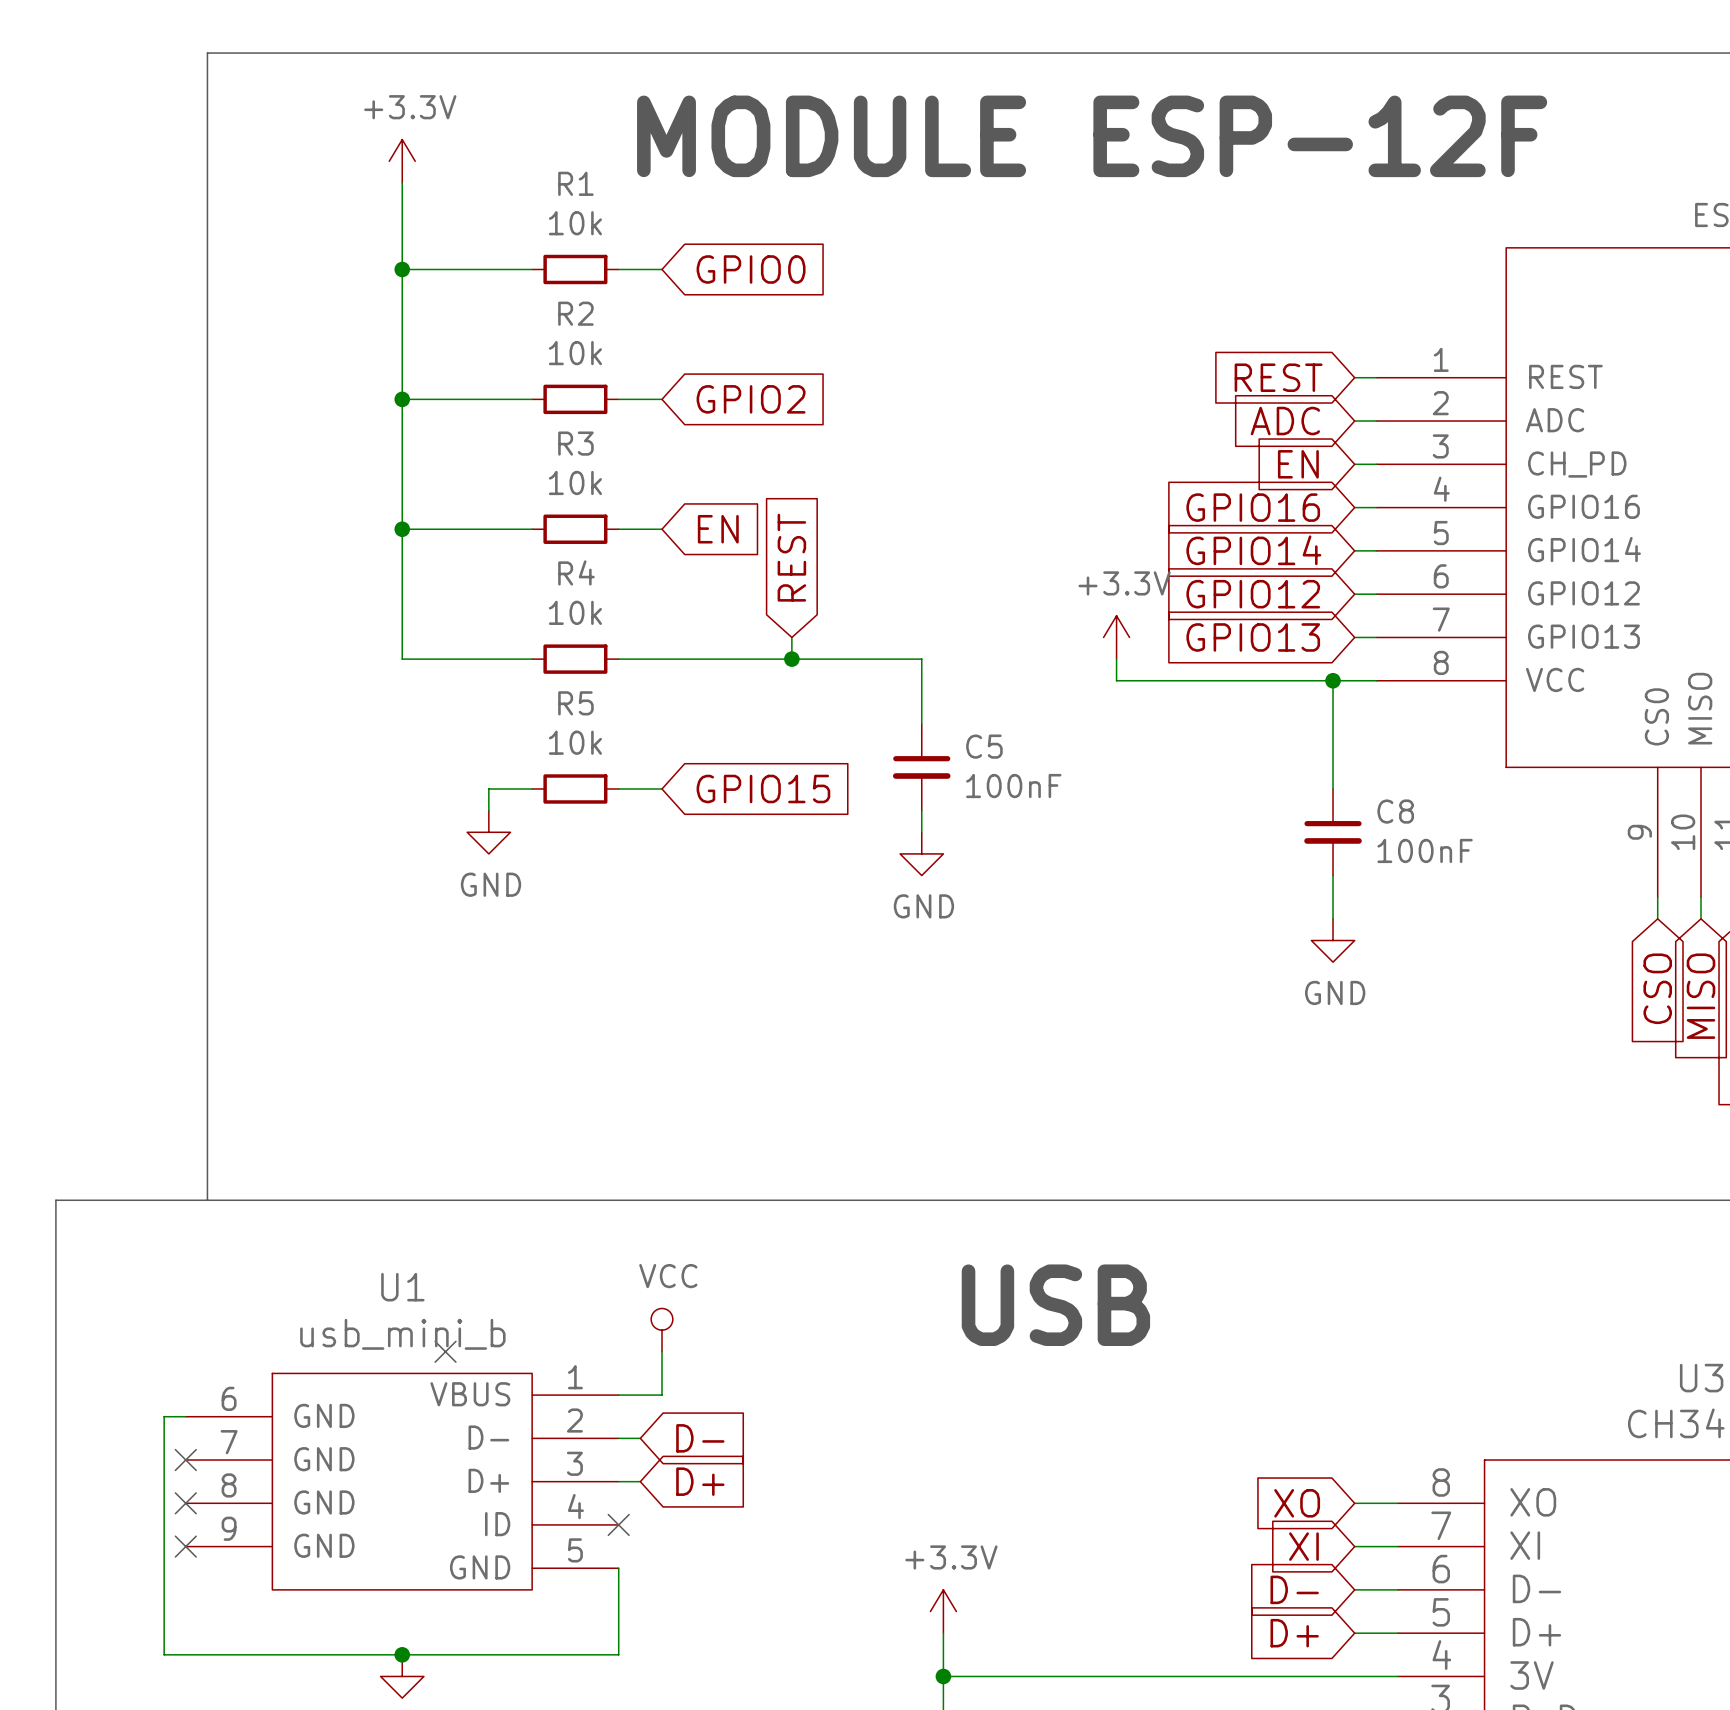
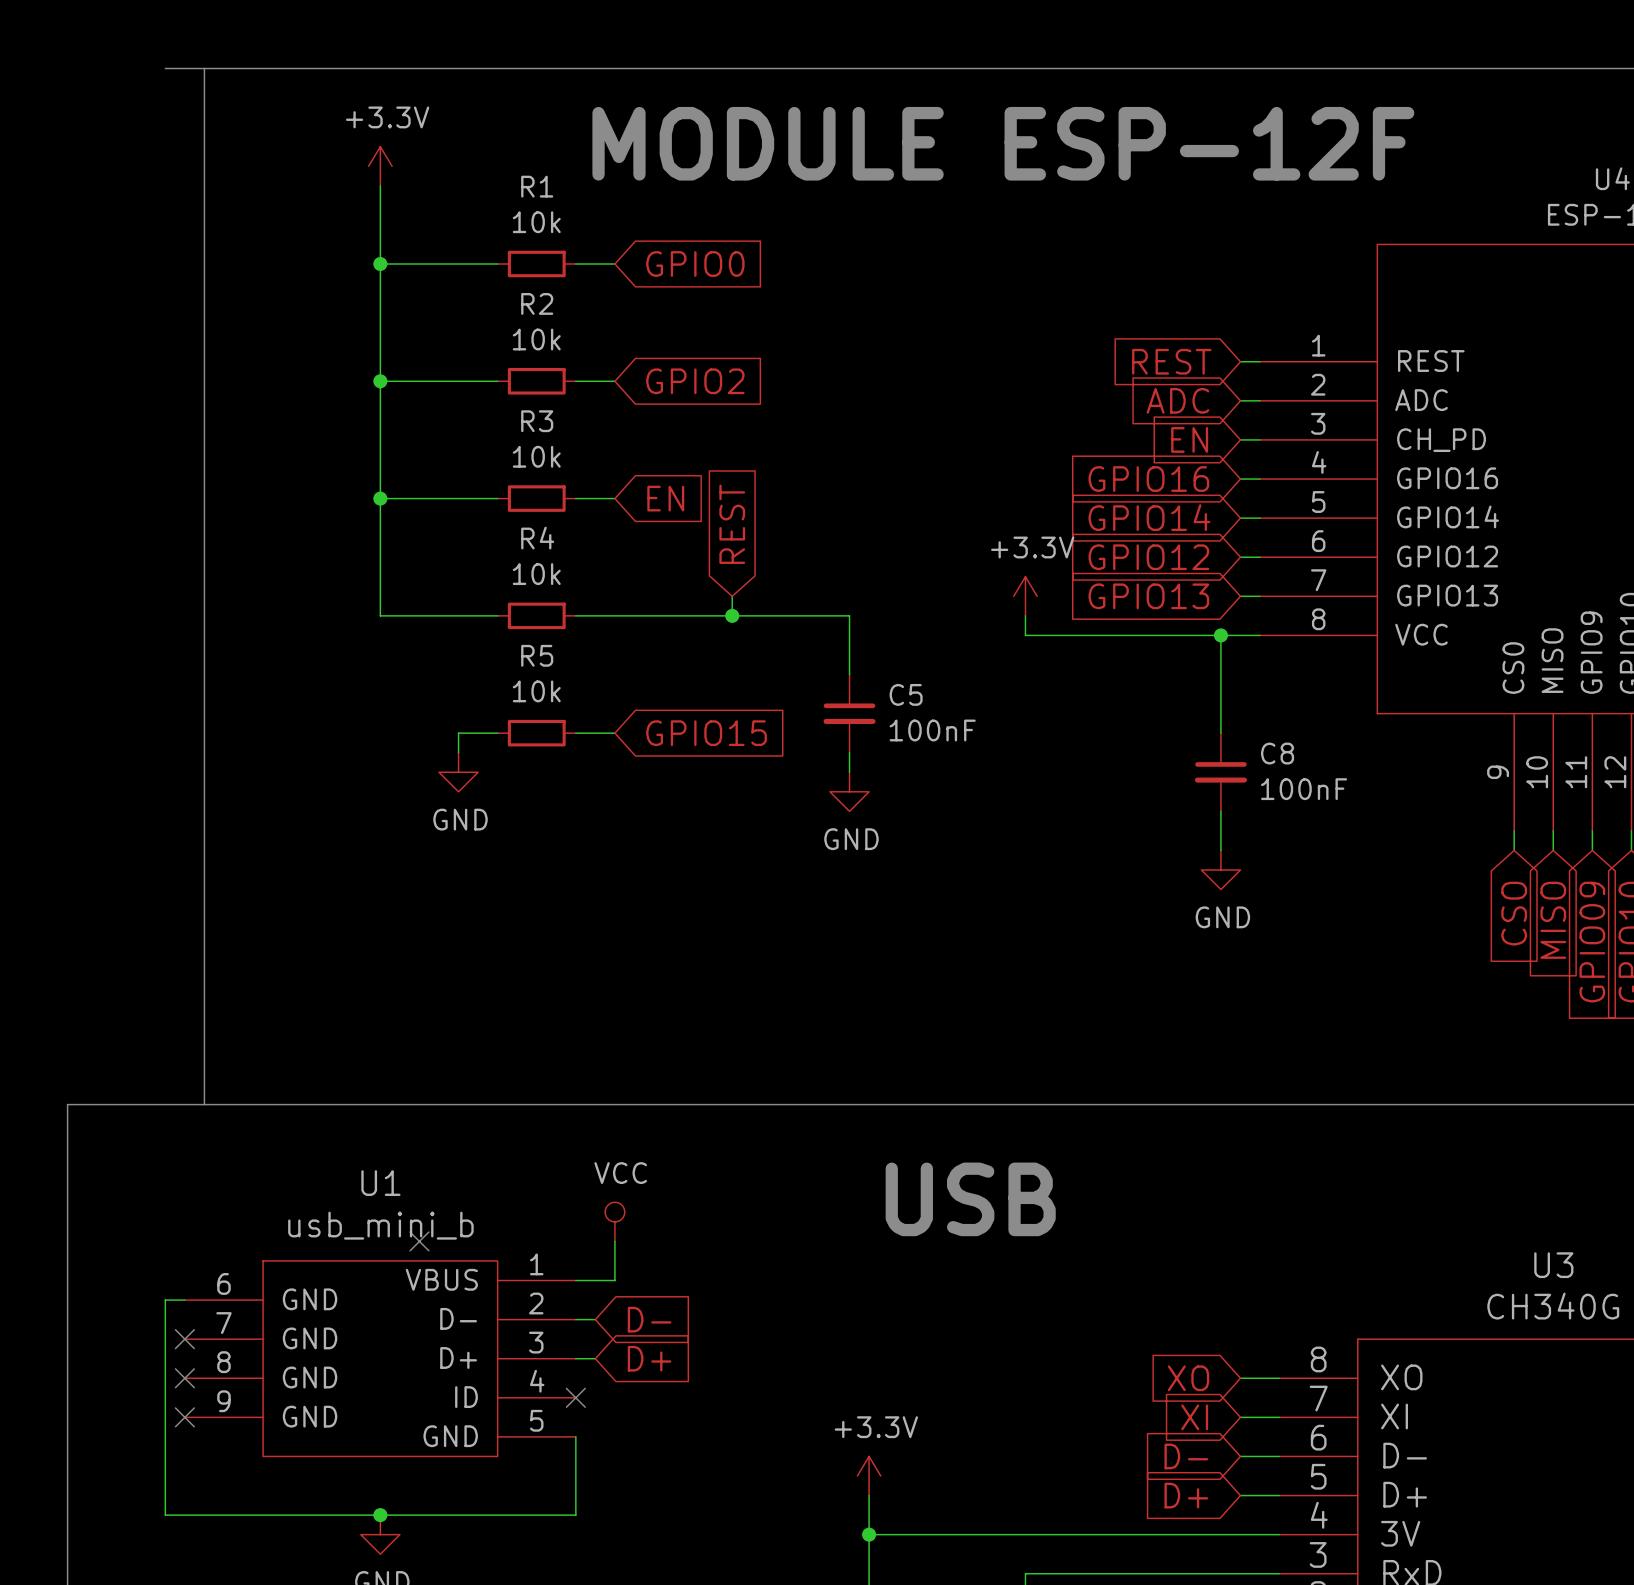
bus: none -> (165, 68) (204, 68)

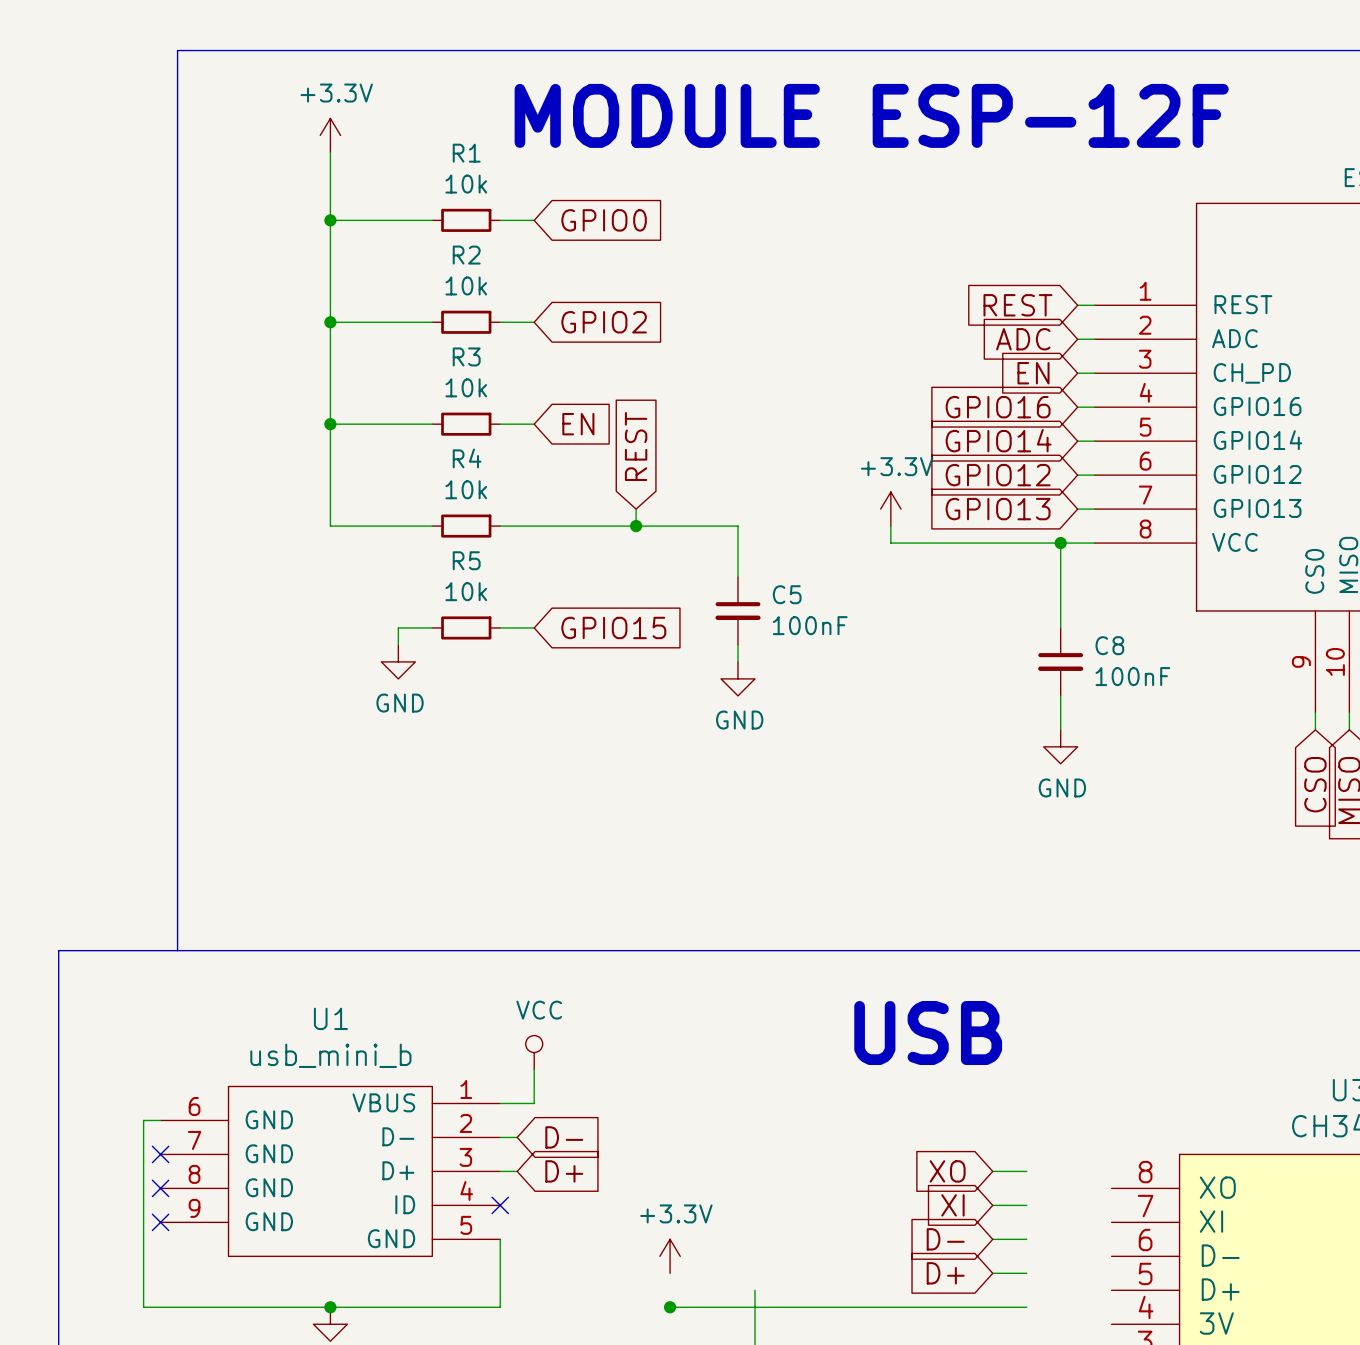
bus: (165, 68) (204, 68) -> none
text position: USB (970, 1199) -> USB (928, 1032)
no-connect mark: (419, 1241) -> none
global label position: XO (1188, 1378) -> XO (947, 1171)
wire: (1240, 1378) (1279, 1378) -> (992, 1171) (1026, 1171)
global label position: XI (1194, 1417) -> XI (952, 1205)
wire: (1240, 1417) (1279, 1417) -> (992, 1205) (1026, 1205)
global label position: D- (1186, 1456) -> D- (945, 1239)
wire: (1240, 1456) (1279, 1456) -> (992, 1239) (1026, 1239)
power symbol position: +3.3V (869, 1476) -> +3.3V (670, 1256)
global label position: D+ (1186, 1495) -> D+ (945, 1273)
wire: (1240, 1495) (1279, 1495) -> (992, 1273) (1026, 1273)
junction: none -> (670, 1307)
wire: (869, 1534) (1279, 1534) -> (670, 1307) (1026, 1307)
junction: (869, 1534) -> none

